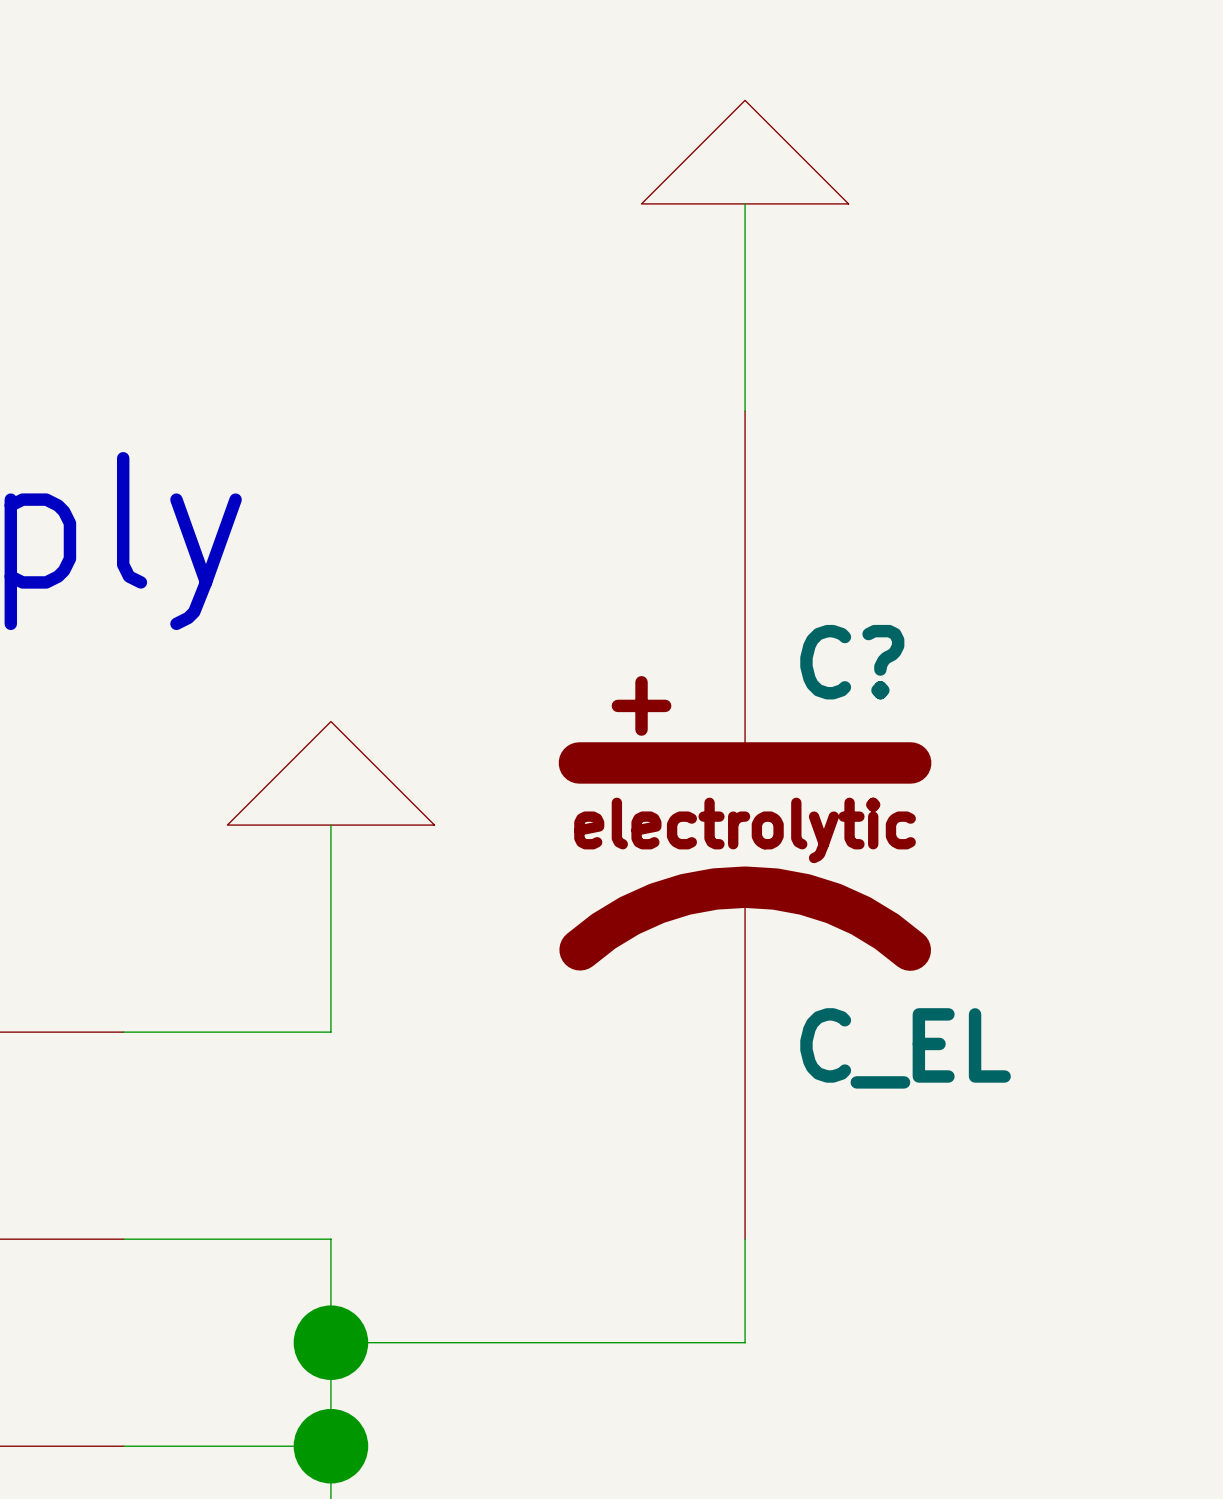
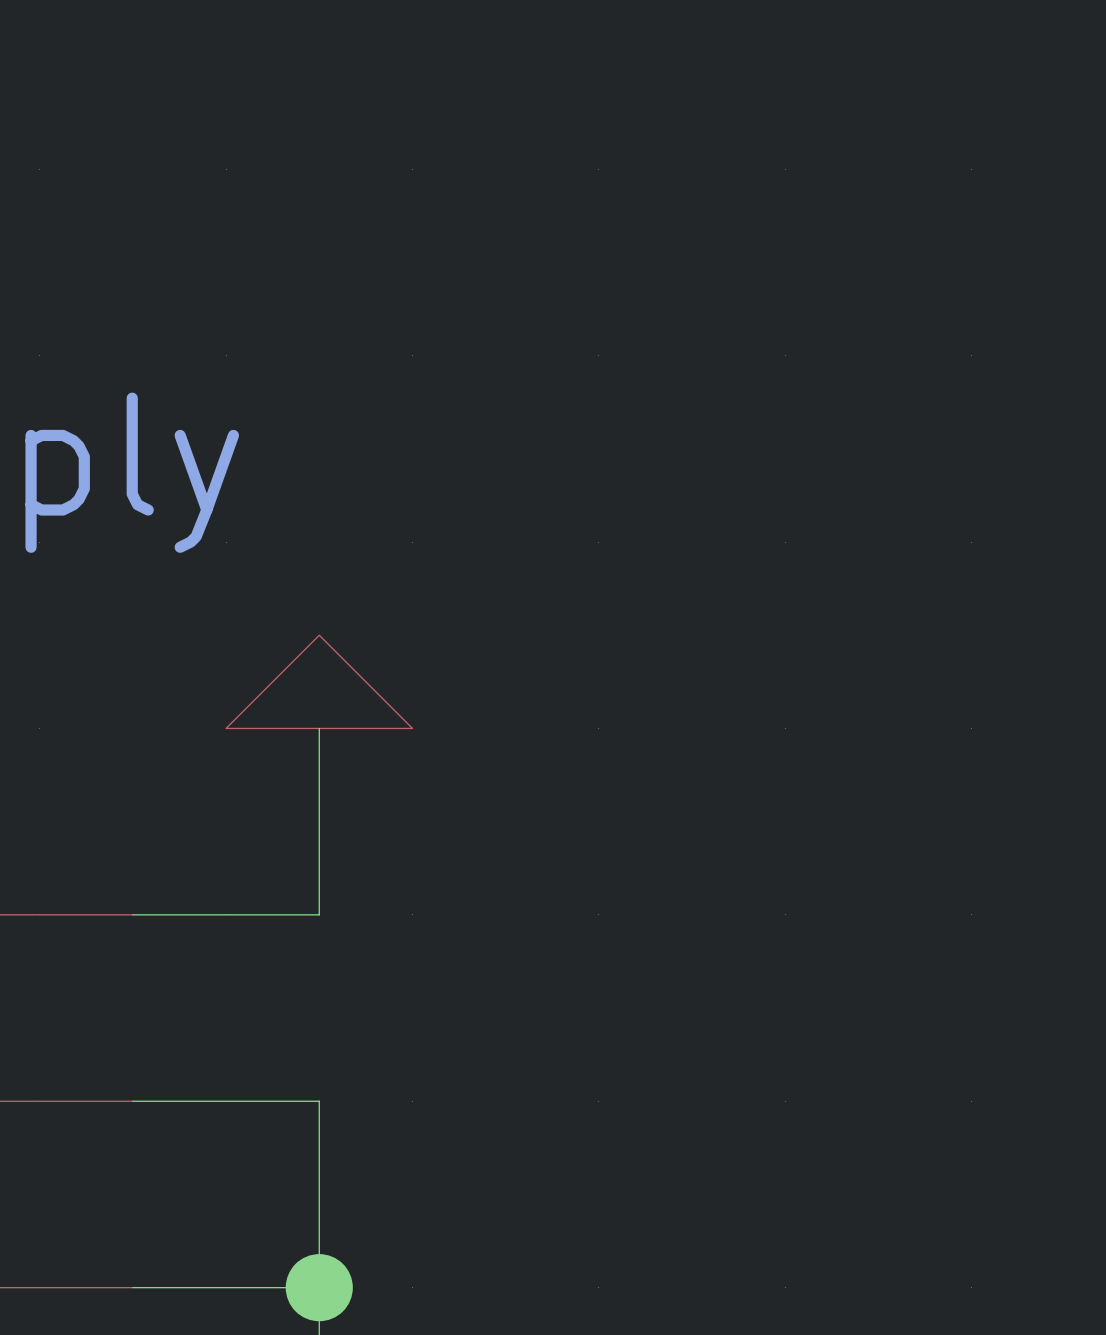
power symbol: (745, 152) -> none
wire: (745, 203) (745, 410) -> none
C?: C_EL (745, 825) -> none
wire: (745, 1239) (745, 1342) (330, 1342) -> none
junction: (330, 1342) -> none

